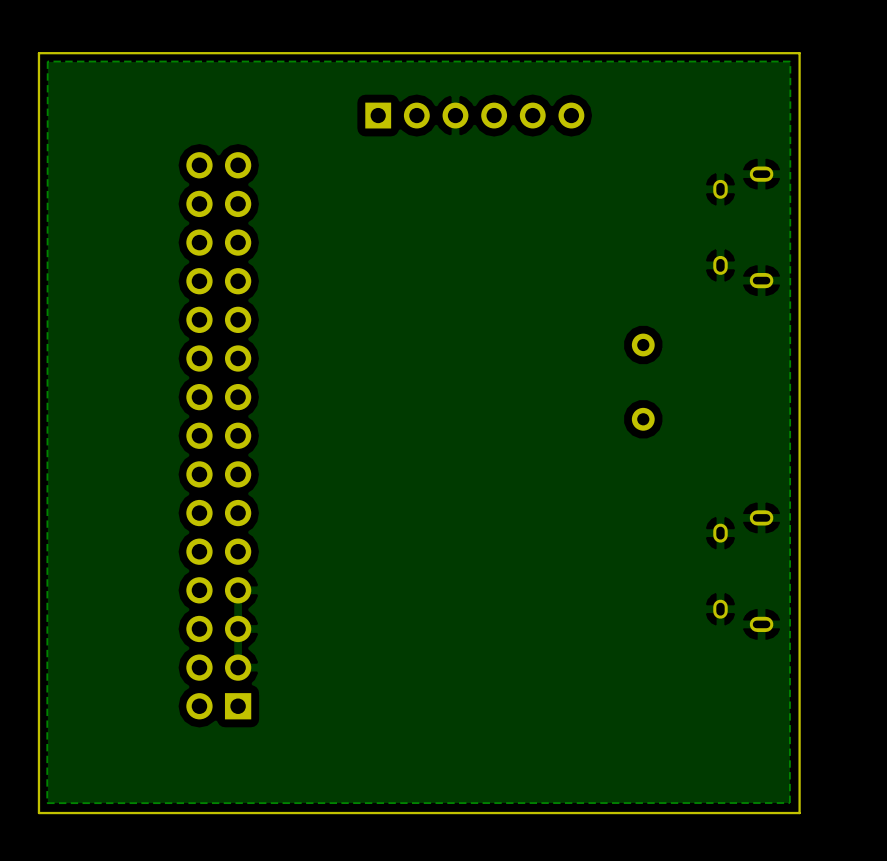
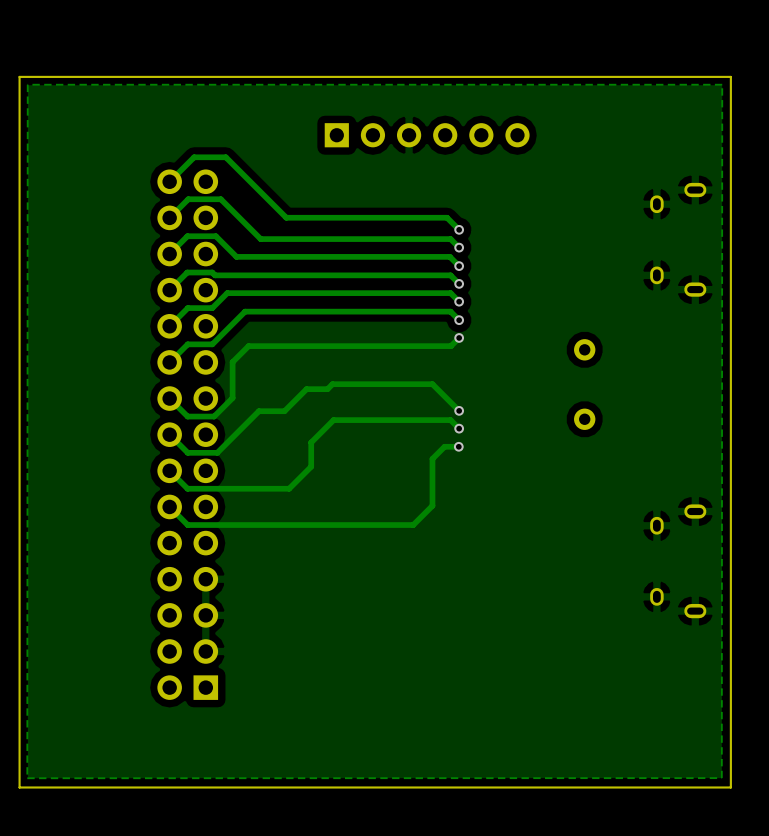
track: none -> (169, 181) (194, 157) (225, 157) (286, 217) (447, 217) (459, 229)
track: none -> (169, 217) (188, 199) (220, 199) (260, 239) (450, 239) (459, 247)
via: none -> (459, 229)
via: none -> (459, 247)
track: none -> (169, 254) (187, 236) (215, 236) (236, 256) (449, 256) (459, 266)
via: none -> (459, 266)
track: none -> (459, 283) (450, 275) (215, 275) (212, 272) (187, 272) (169, 290)
via: none -> (459, 283)
track: none -> (459, 301) (450, 293) (227, 293) (212, 308) (187, 308) (169, 326)
via: none -> (459, 301)
track: none -> (459, 320) (450, 311) (245, 311) (212, 344) (187, 344) (169, 362)
via: none -> (459, 320)
track: none -> (459, 337) (450, 346) (248, 346) (232, 362) (232, 398) (214, 416) (187, 416) (169, 398)
via: none -> (459, 337)
track: none -> (459, 410) (432, 384) (332, 384) (327, 389) (306, 389) (284, 411) (258, 411) (217, 452) (187, 452) (169, 434)
via: none -> (459, 410)
track: none -> (459, 428) (450, 420) (333, 420) (311, 442) (311, 466) (289, 488) (187, 488) (169, 470)
via: none -> (459, 428)
track: none -> (458, 446) (444, 446) (432, 458) (432, 505) (413, 525) (187, 525) (169, 506)
via: none -> (458, 446)

